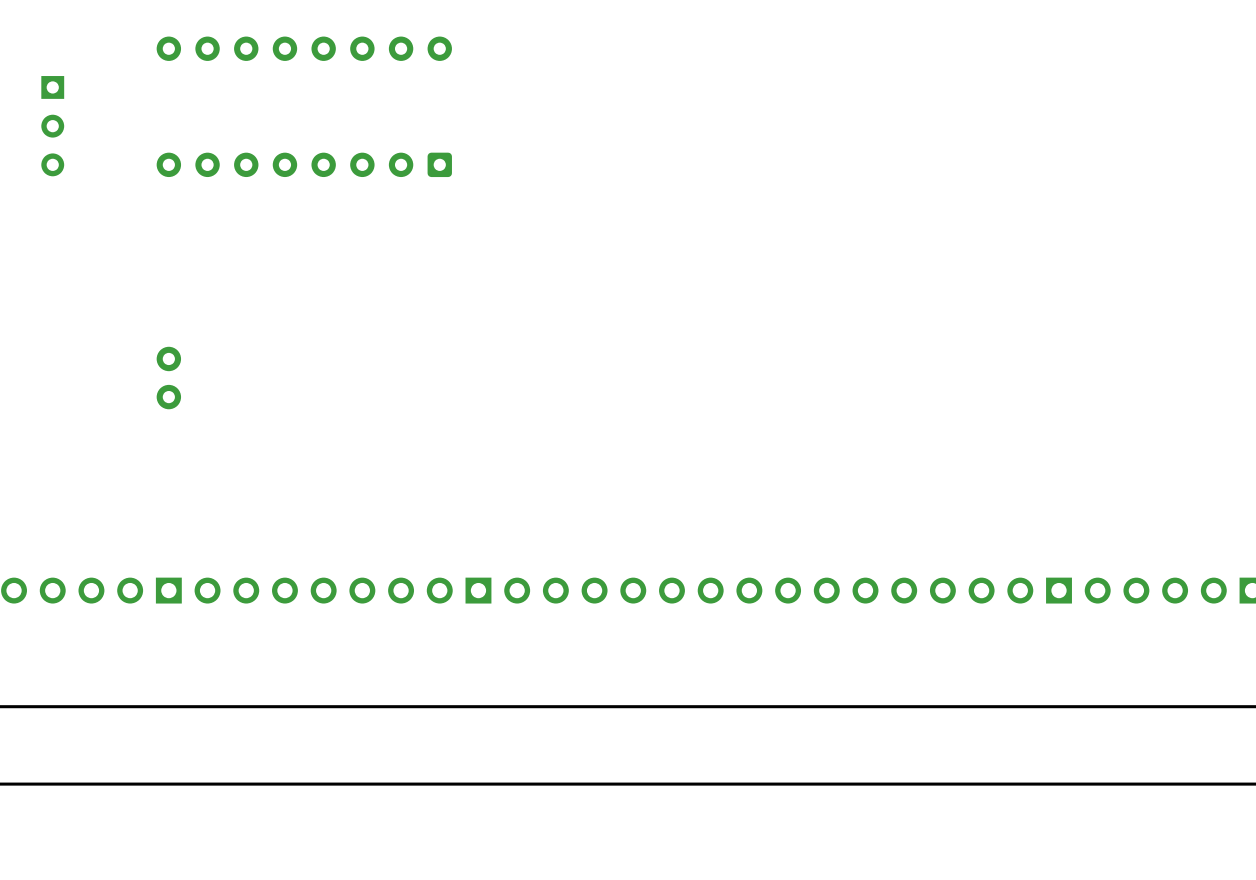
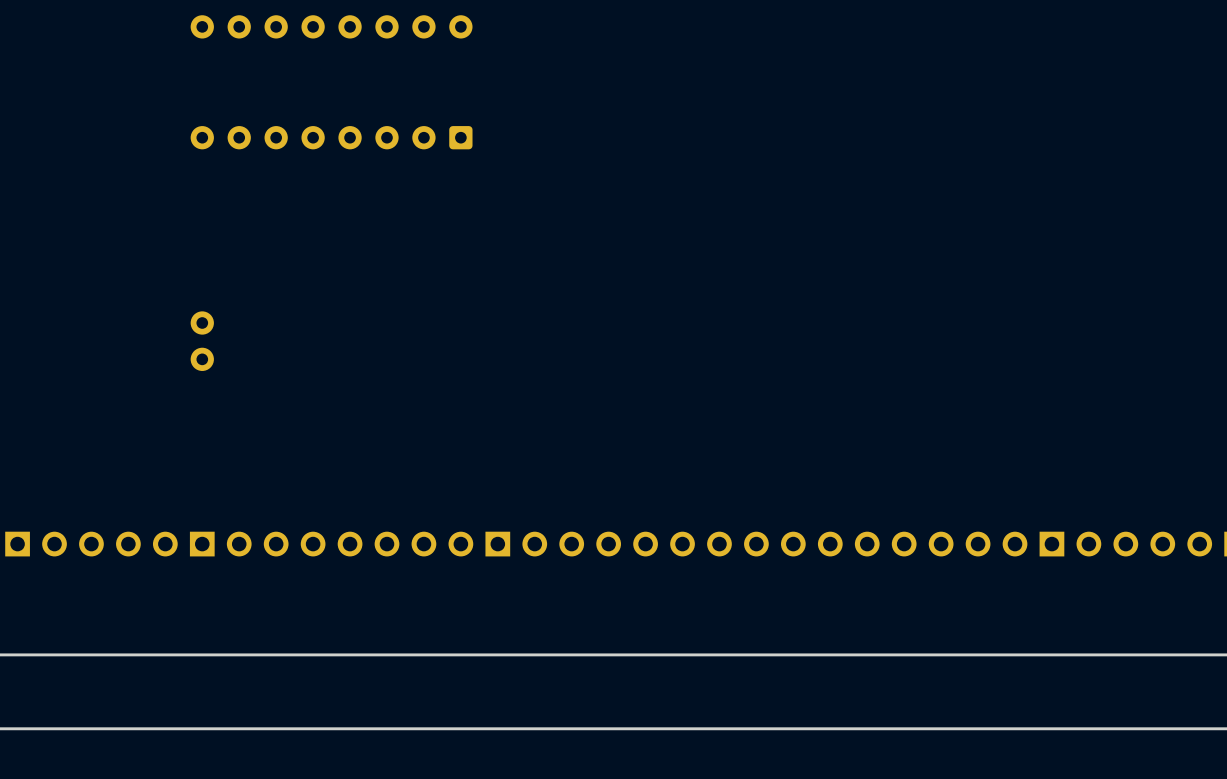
part: (52, 126) -> none

